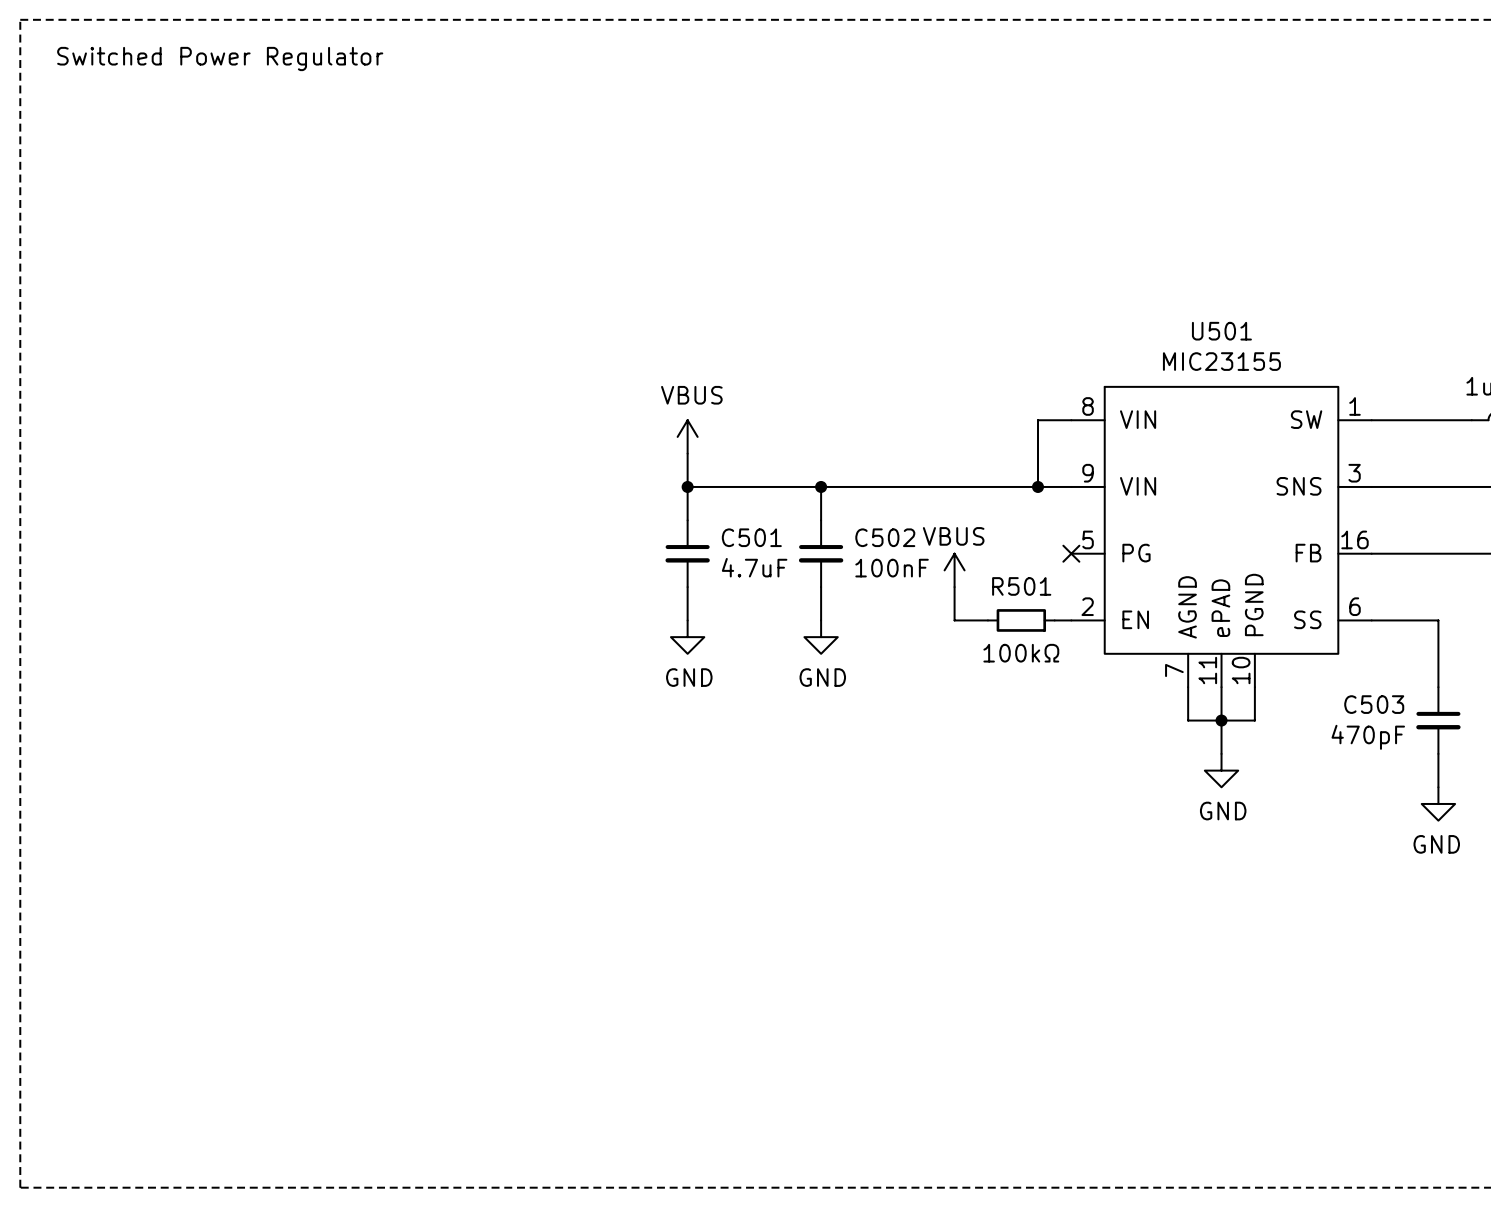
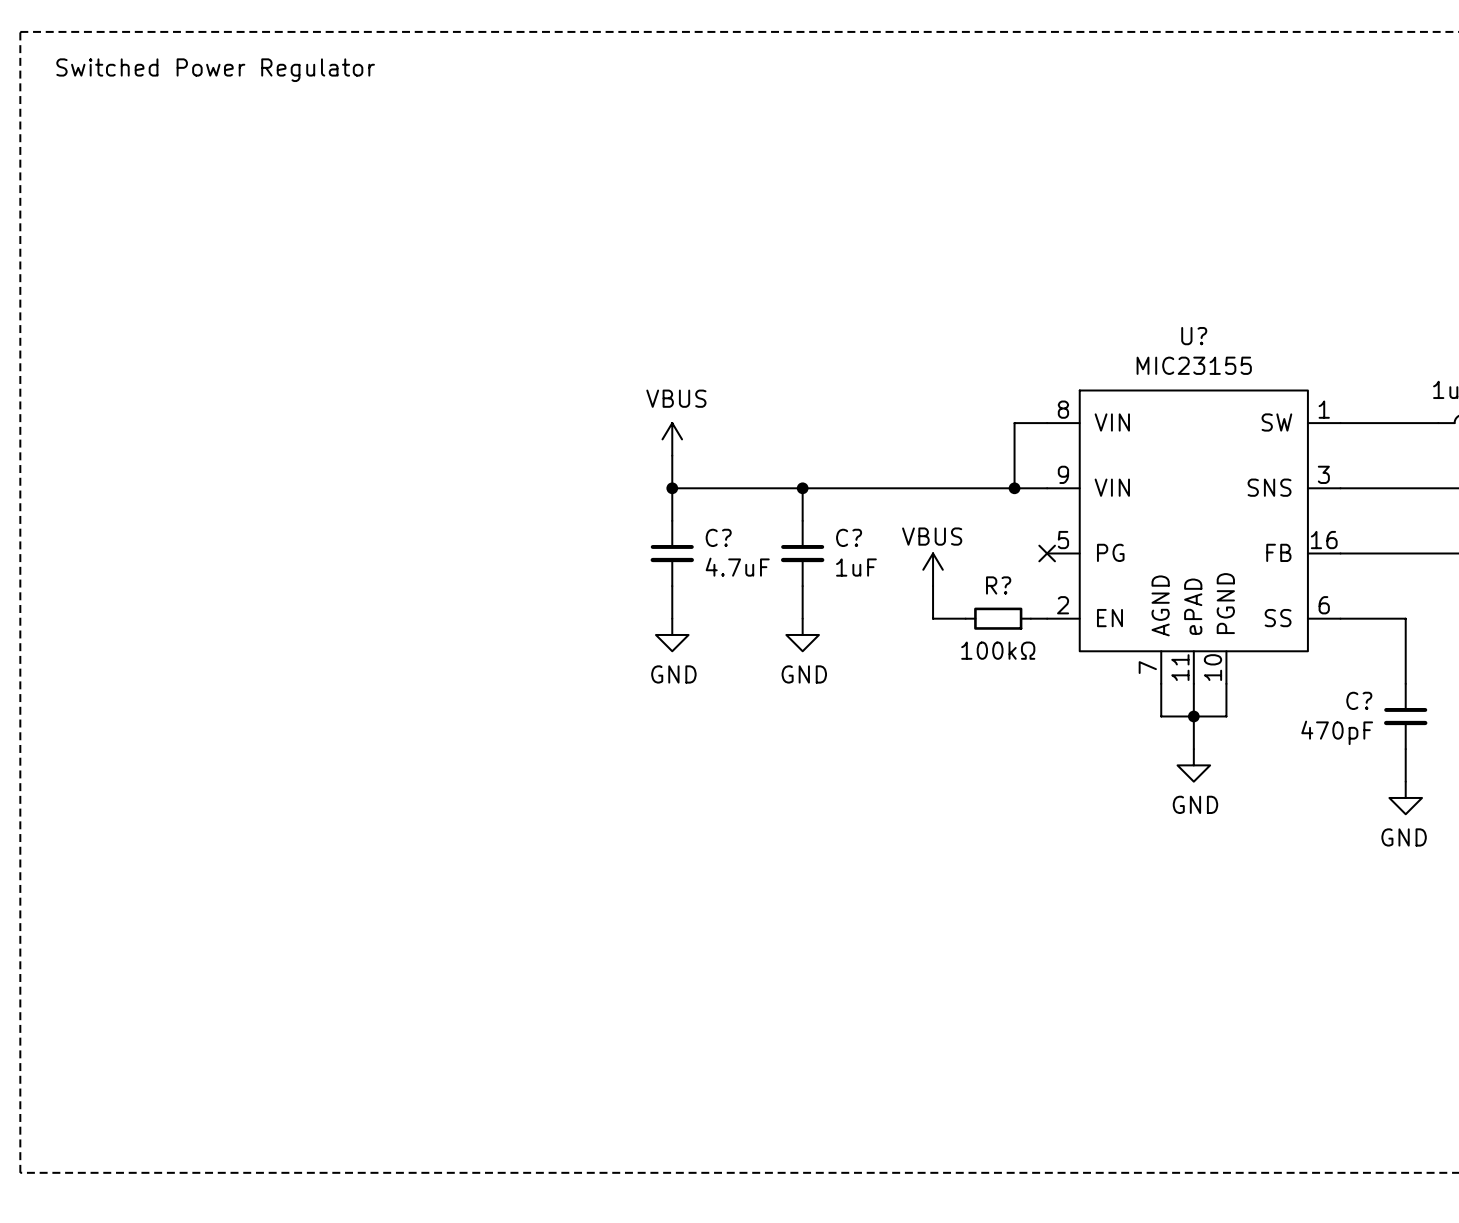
U501 name: U501 (1221, 331) -> U? (1194, 336)
C501 name: C501 (751, 537) -> C? (718, 537)
C502 name: C502 (885, 537) -> C? (849, 537)
C502 value: 100nF (892, 568) -> 1uF (856, 567)
R501 name: R501 (1021, 586) -> R? (998, 585)
C503 name: C503 (1374, 704) -> C? (1359, 700)

